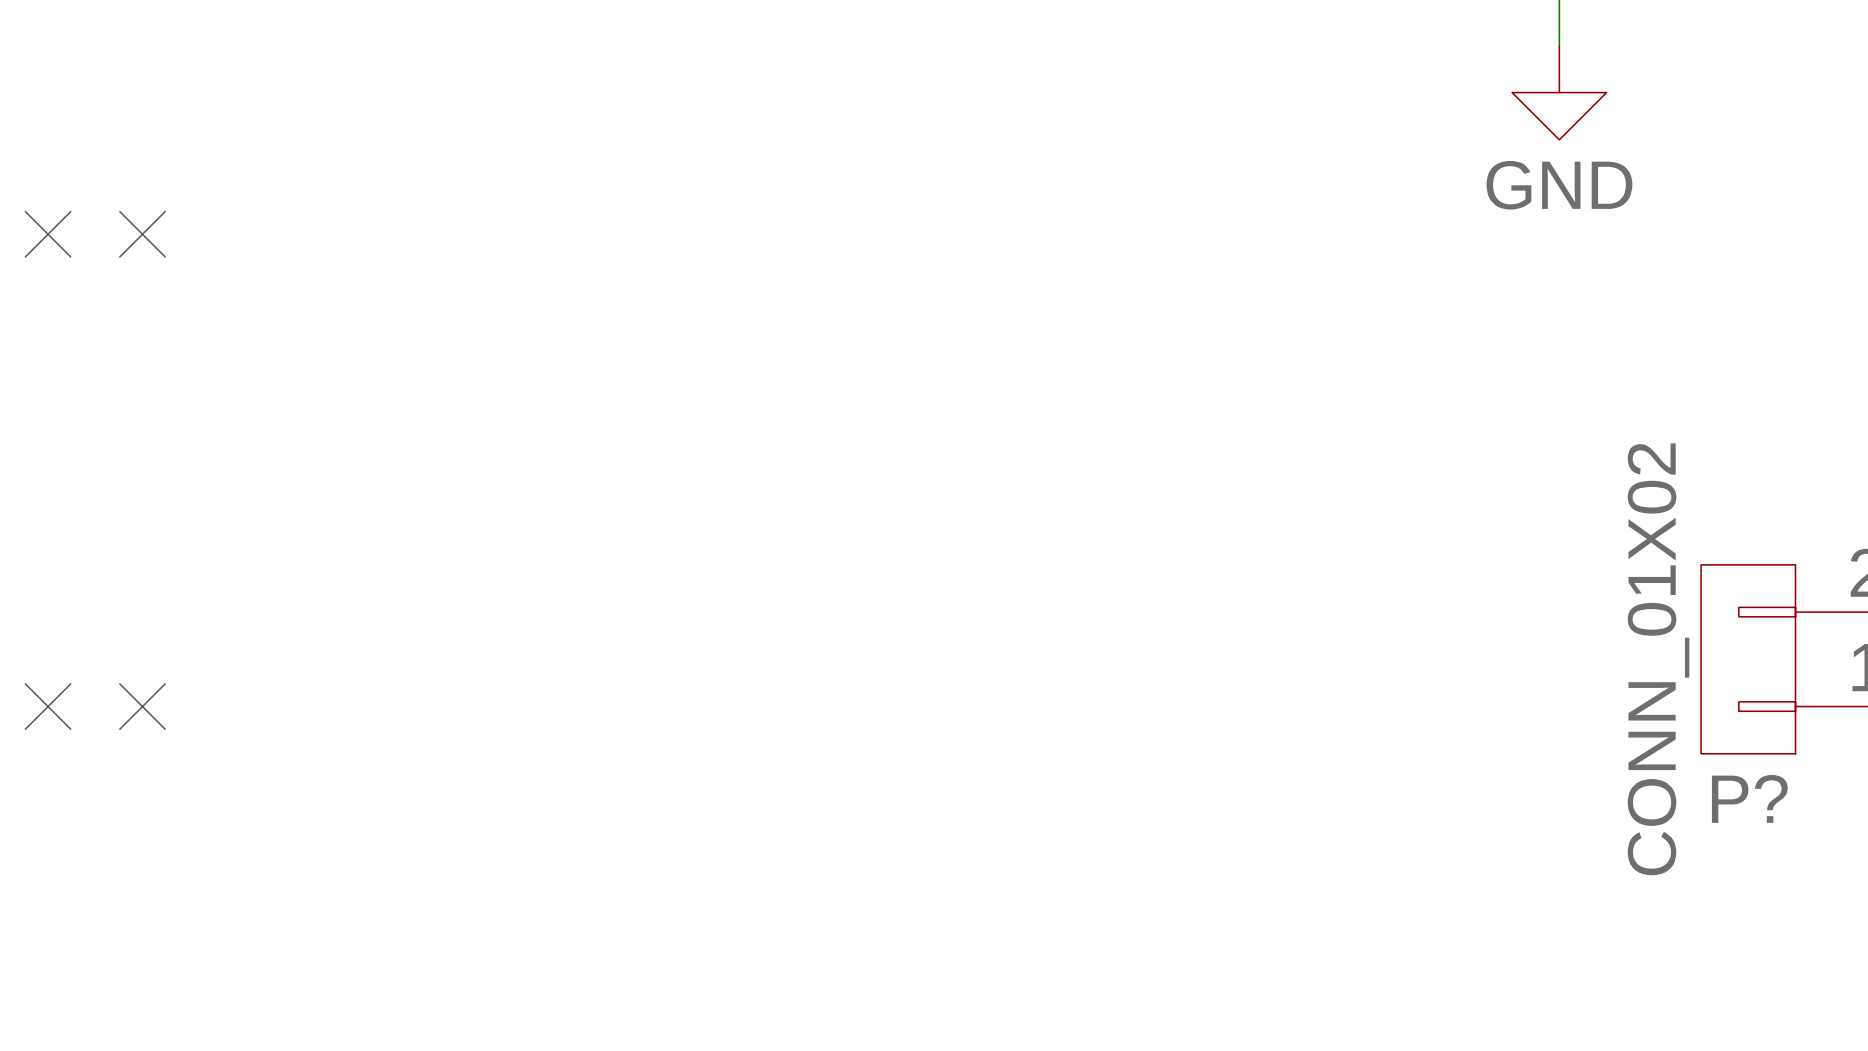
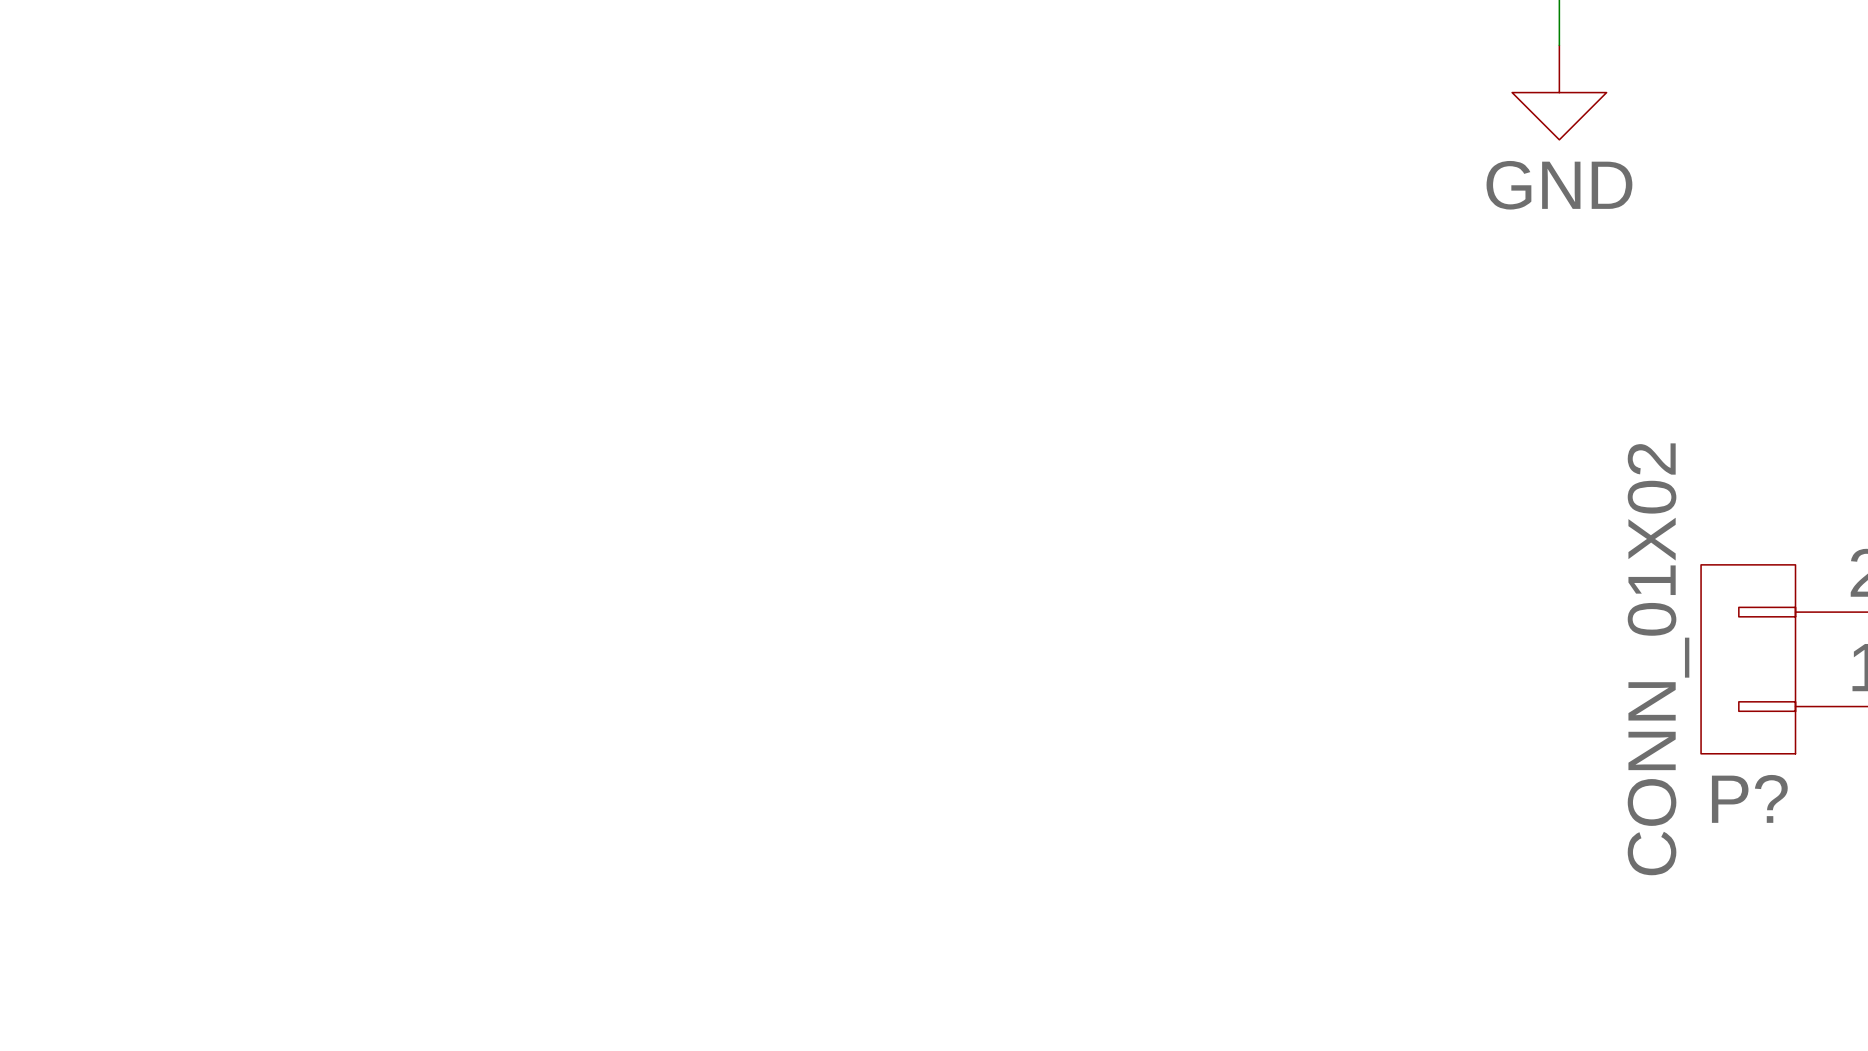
no-connect mark: (48, 234) -> none
no-connect mark: (142, 234) -> none
no-connect mark: (48, 706) -> none
no-connect mark: (142, 706) -> none

